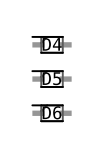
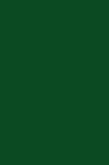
D4: (51, 44) -> none
D5: (51, 79) -> none
D6: (51, 113) -> none

